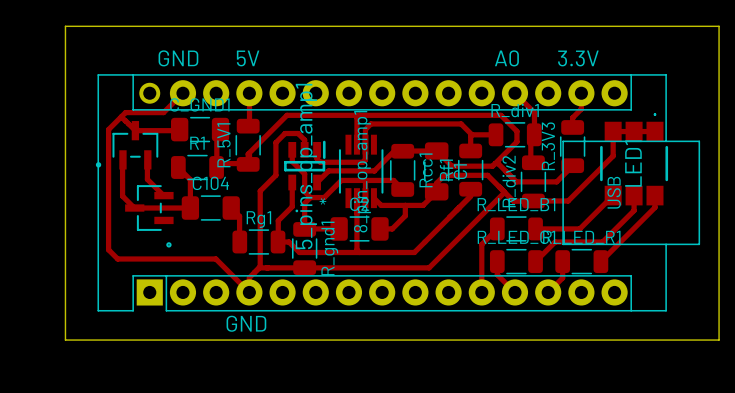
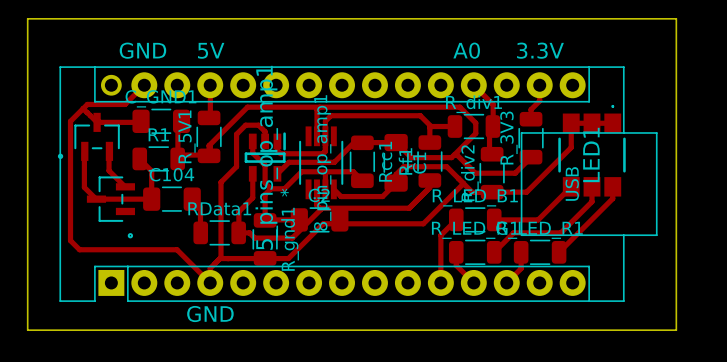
track: (405, 205) (405, 215) (392, 228) (379, 228) -> none
track: (356, 214) (356, 249) (359, 252) -> (316, 205) (320, 209) (292, 238) (254, 238)
track: (449, 217) (414, 252) (299, 252) (294, 247) -> (409, 208) (319, 208)
Rg1 name: Rg1 (258, 219) -> RData1 (219, 208)
track: (464, 232) (429, 267) (328, 267) -> (423, 223) (323, 223) (288, 258)

